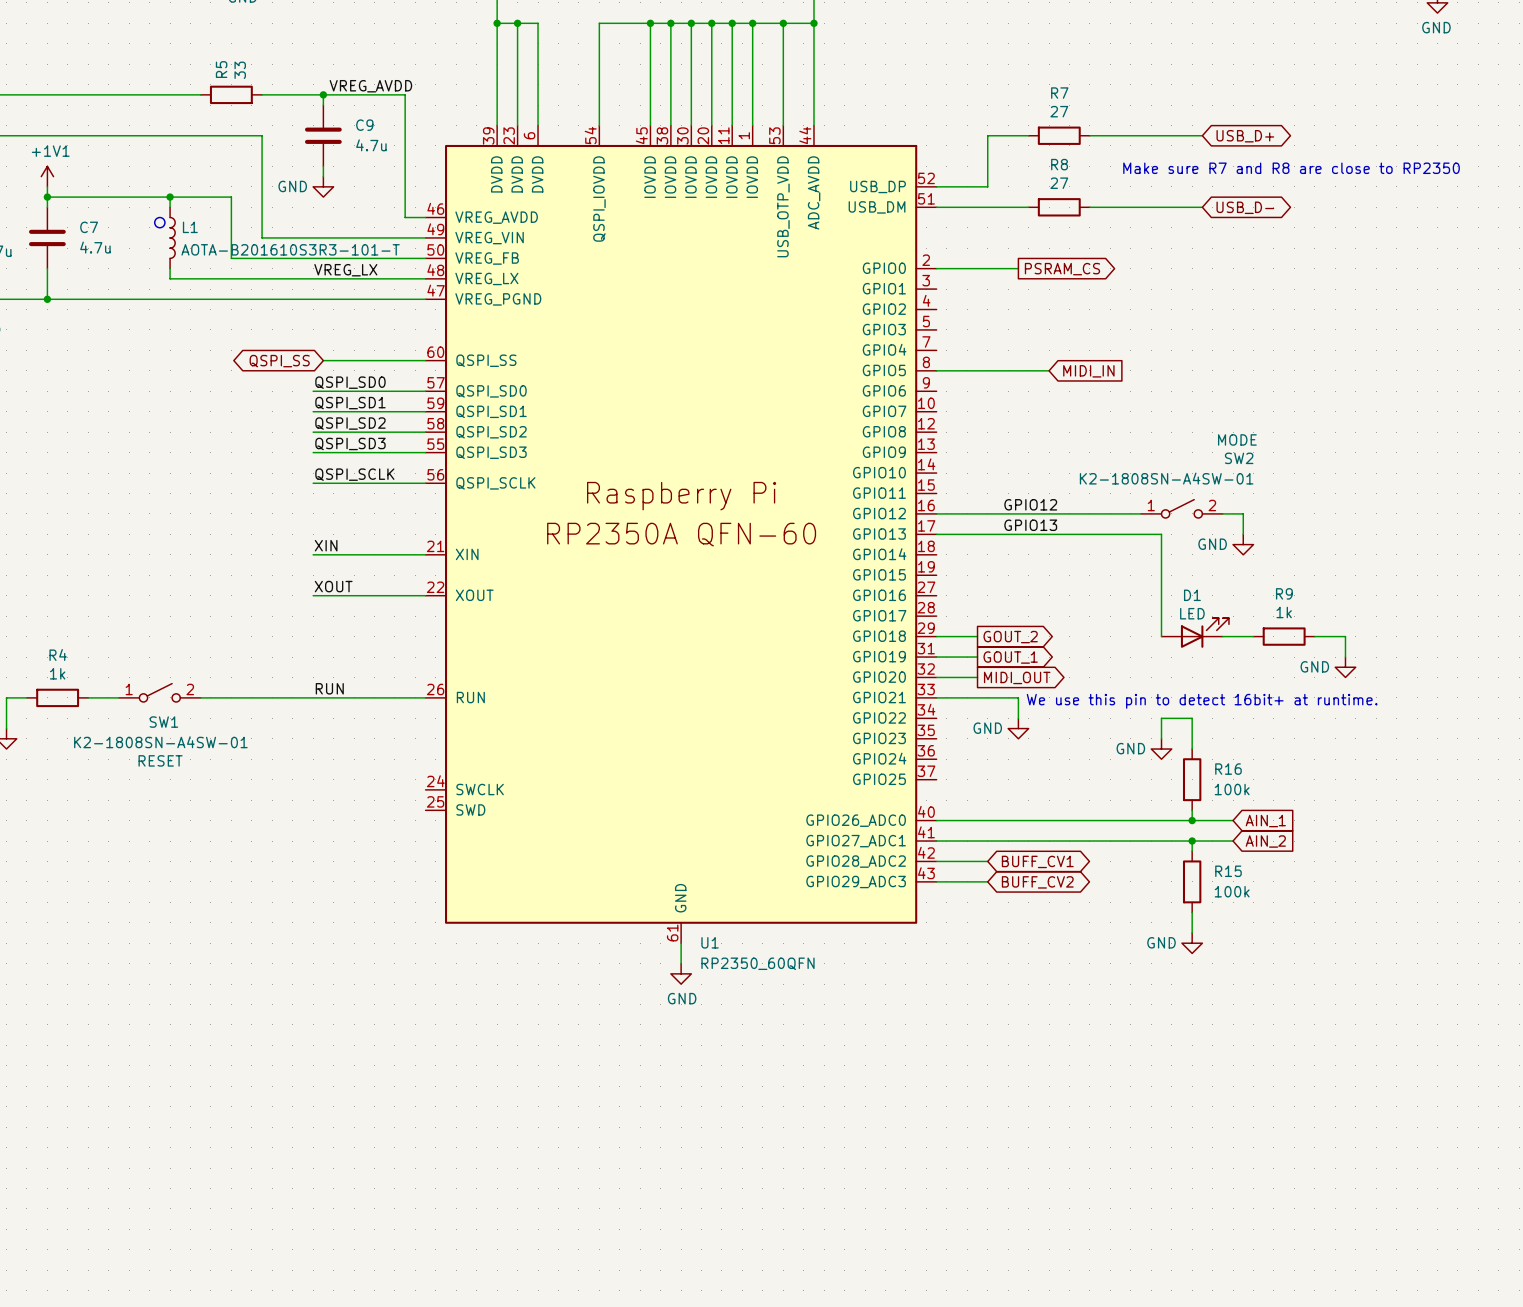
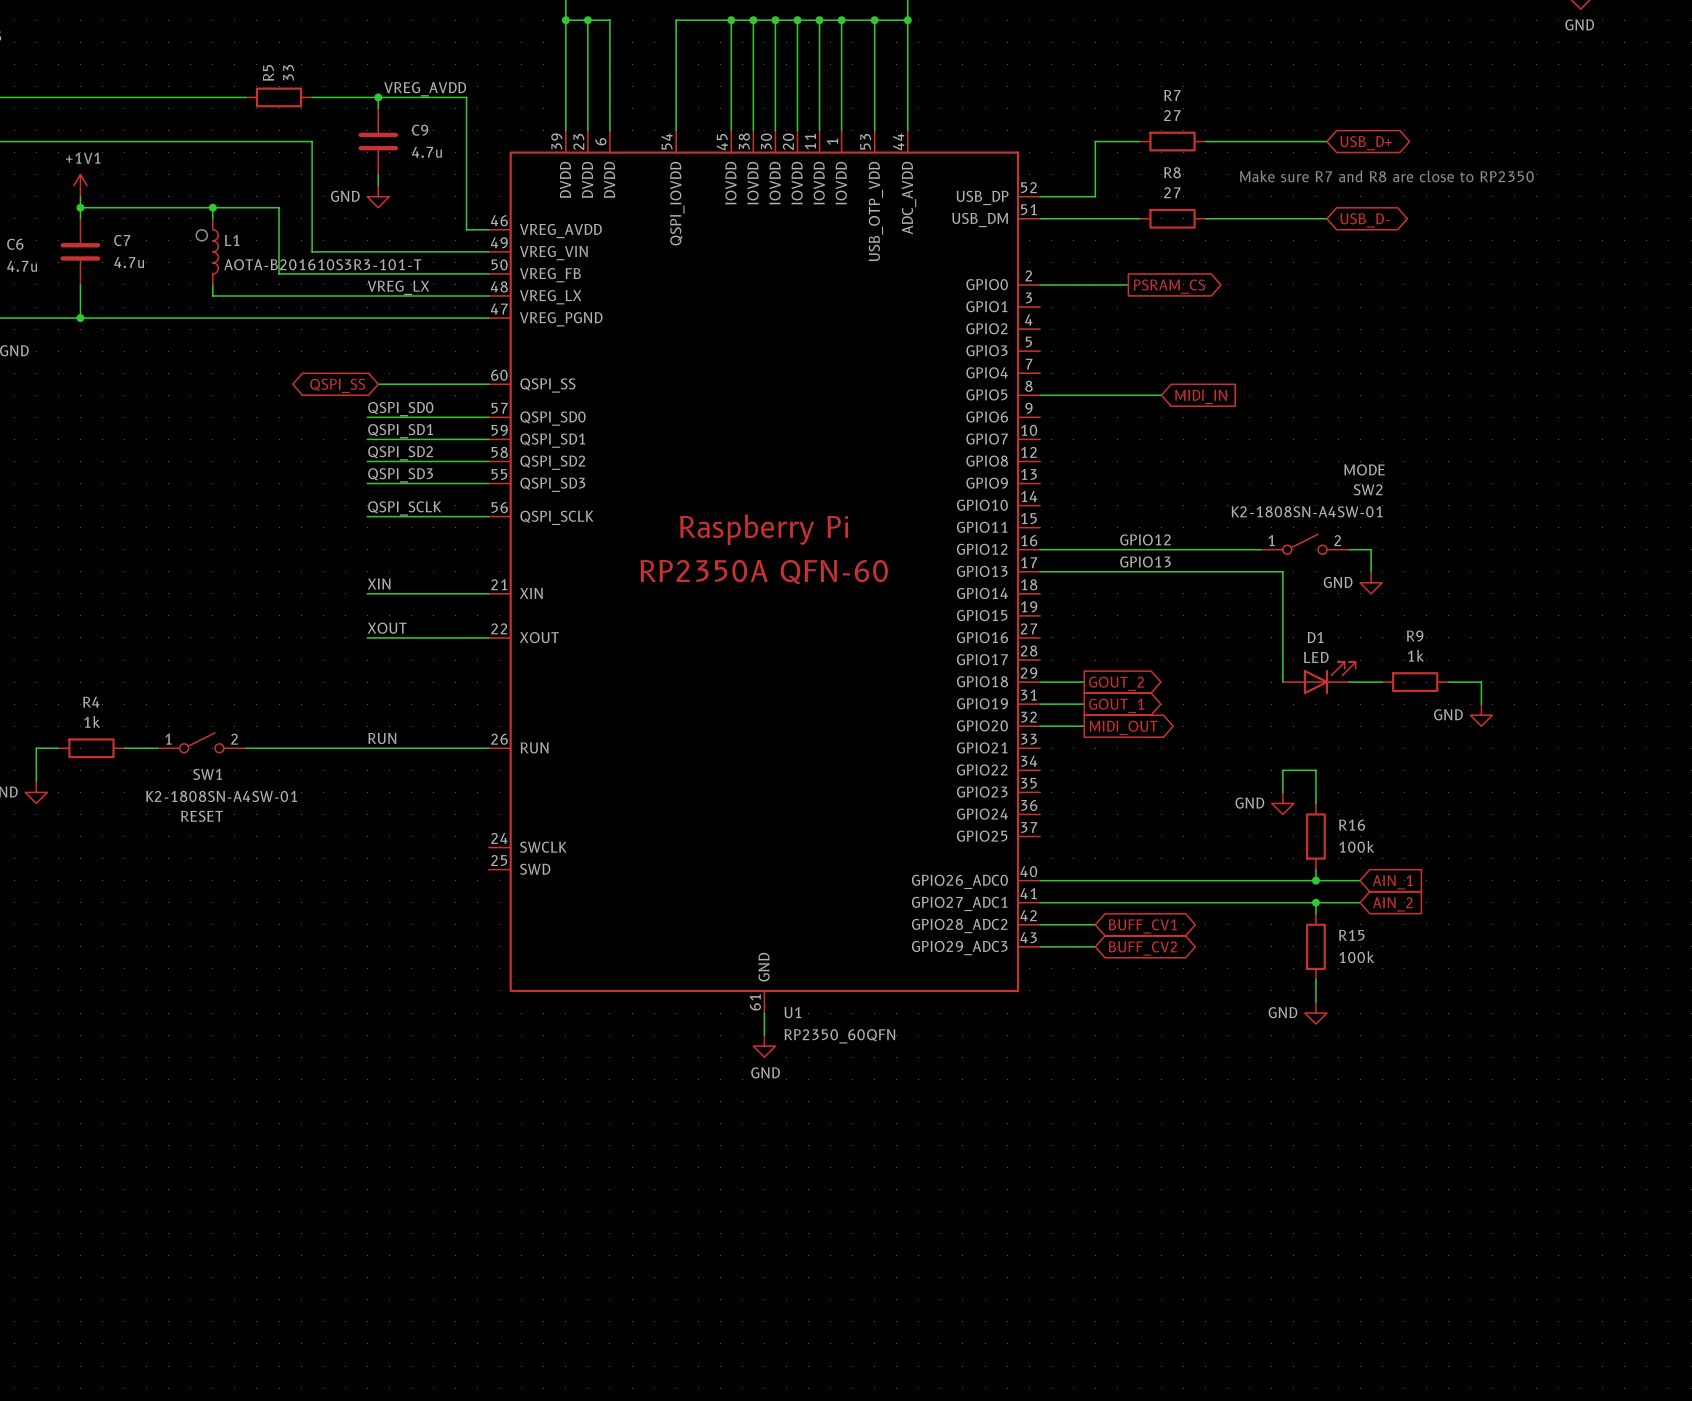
wire: (936, 697) (1018, 697) (1018, 718) -> none
text: We use this pin to detect 16bit+ at runtime. (1202, 701) -> none
power symbol: GND (1018, 728) -> none

